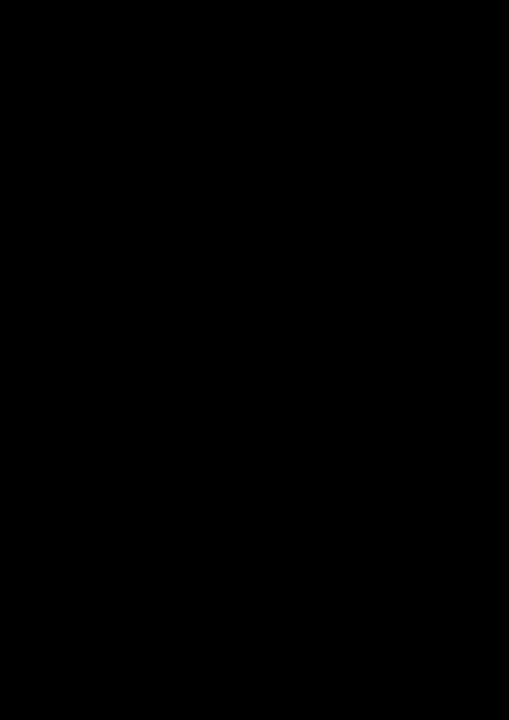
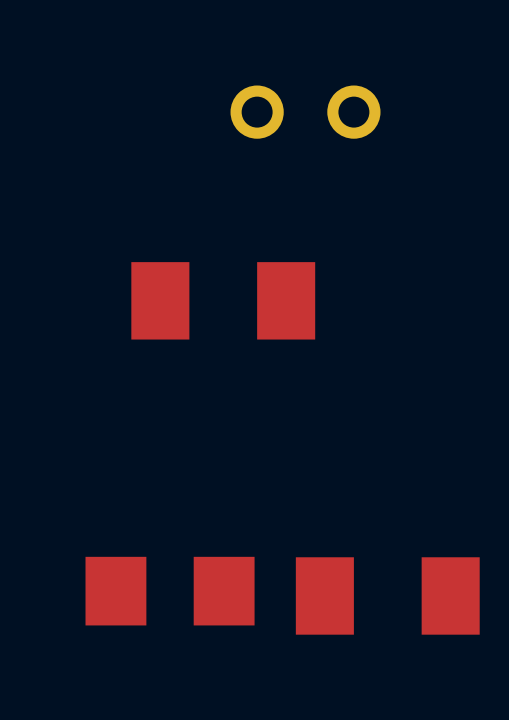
part: none -> (305, 112)
part: none -> (223, 300)
part: none -> (170, 591)
part: none -> (387, 595)

